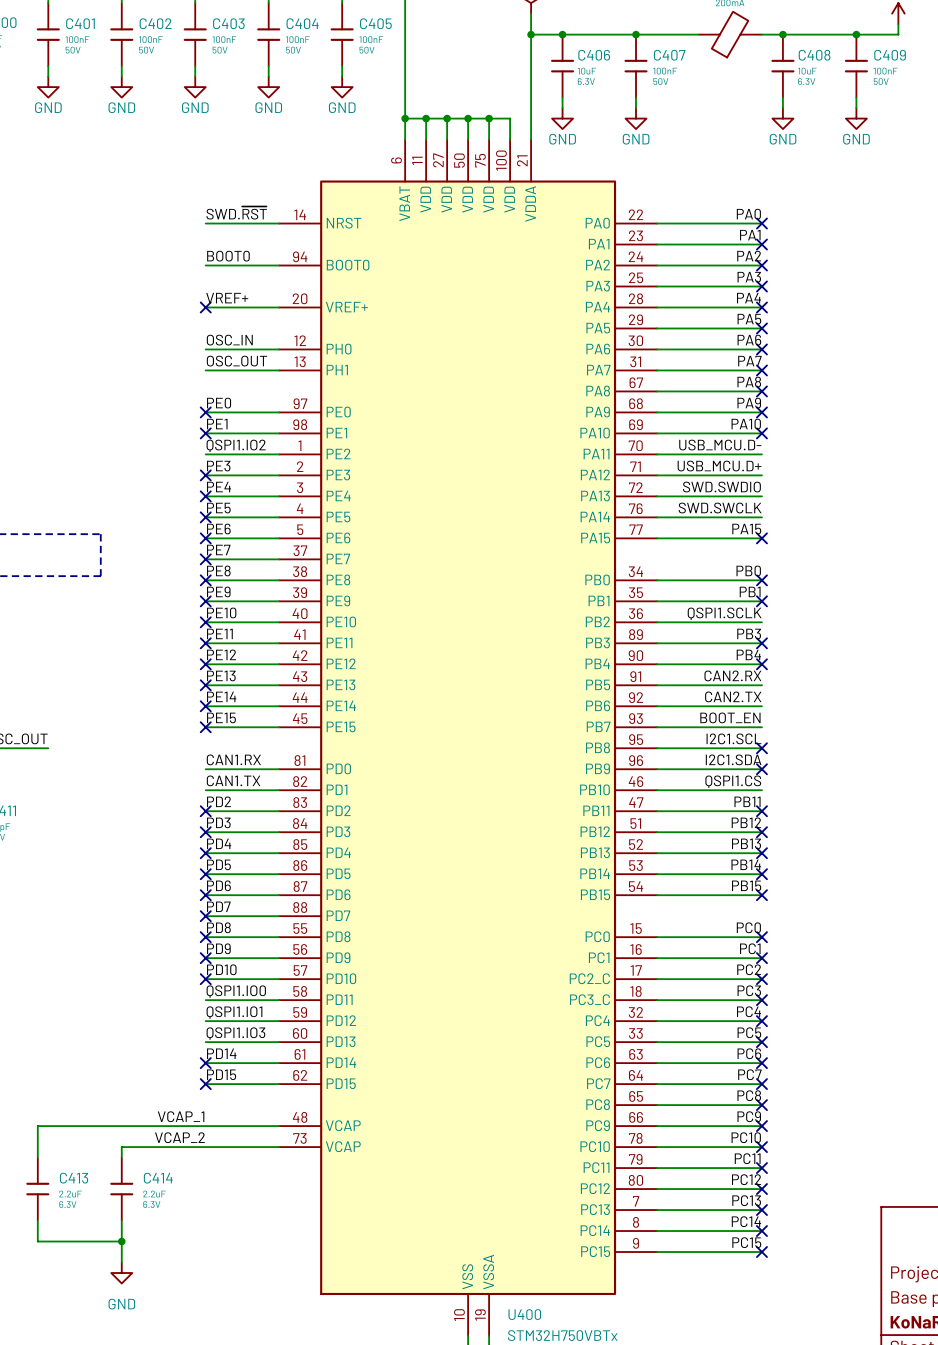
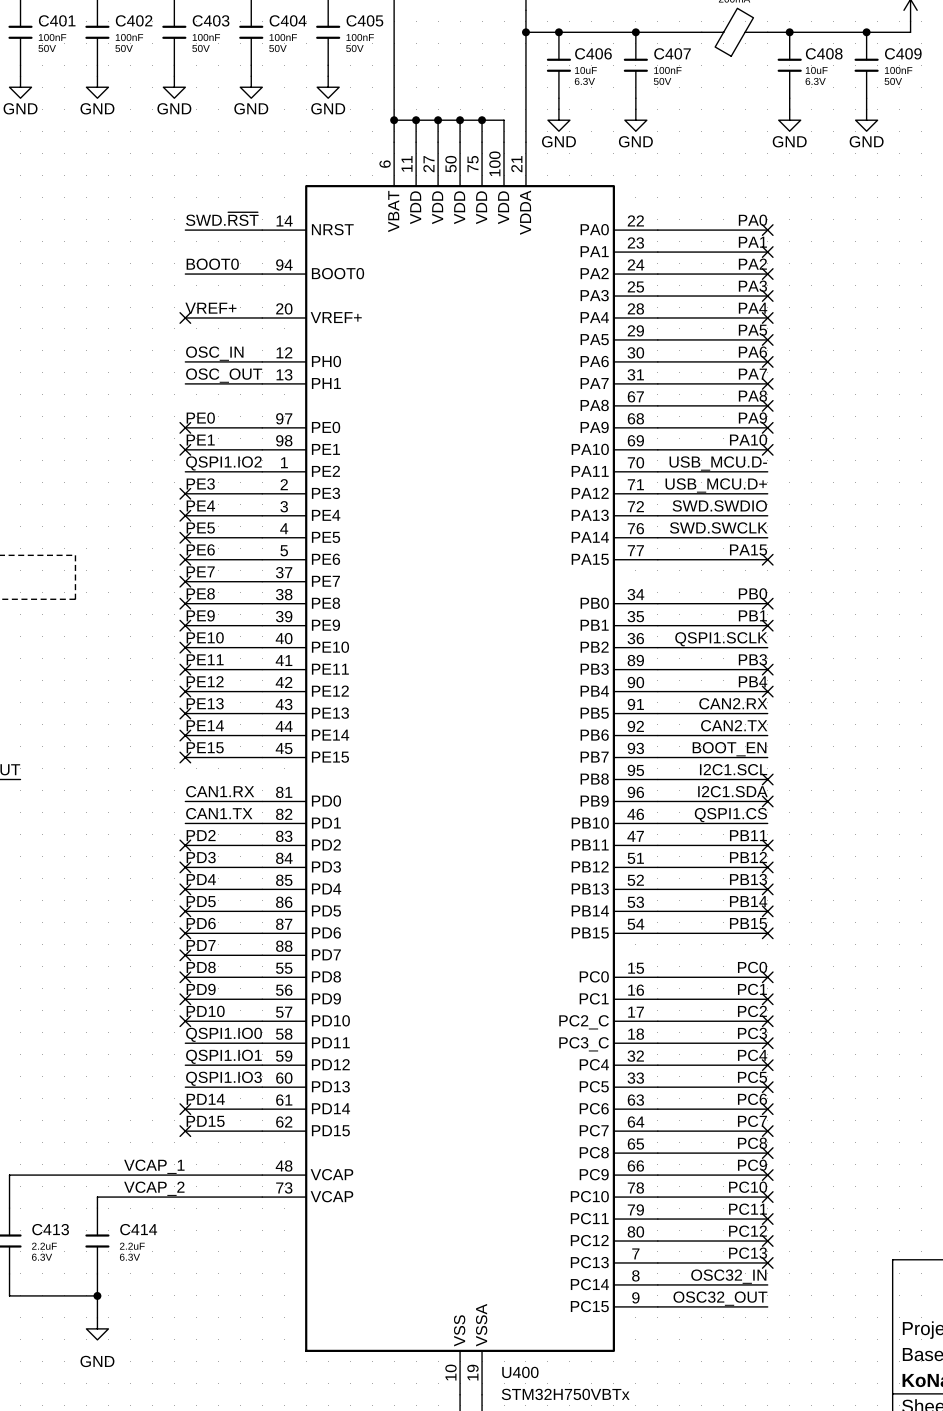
label: PC14 (746, 1221) -> OSC32_IN (728, 1276)
no-connect mark: (761, 1231) -> none
label: PC15 (746, 1242) -> OSC32_OUT (720, 1298)
no-connect mark: (761, 1252) -> none

